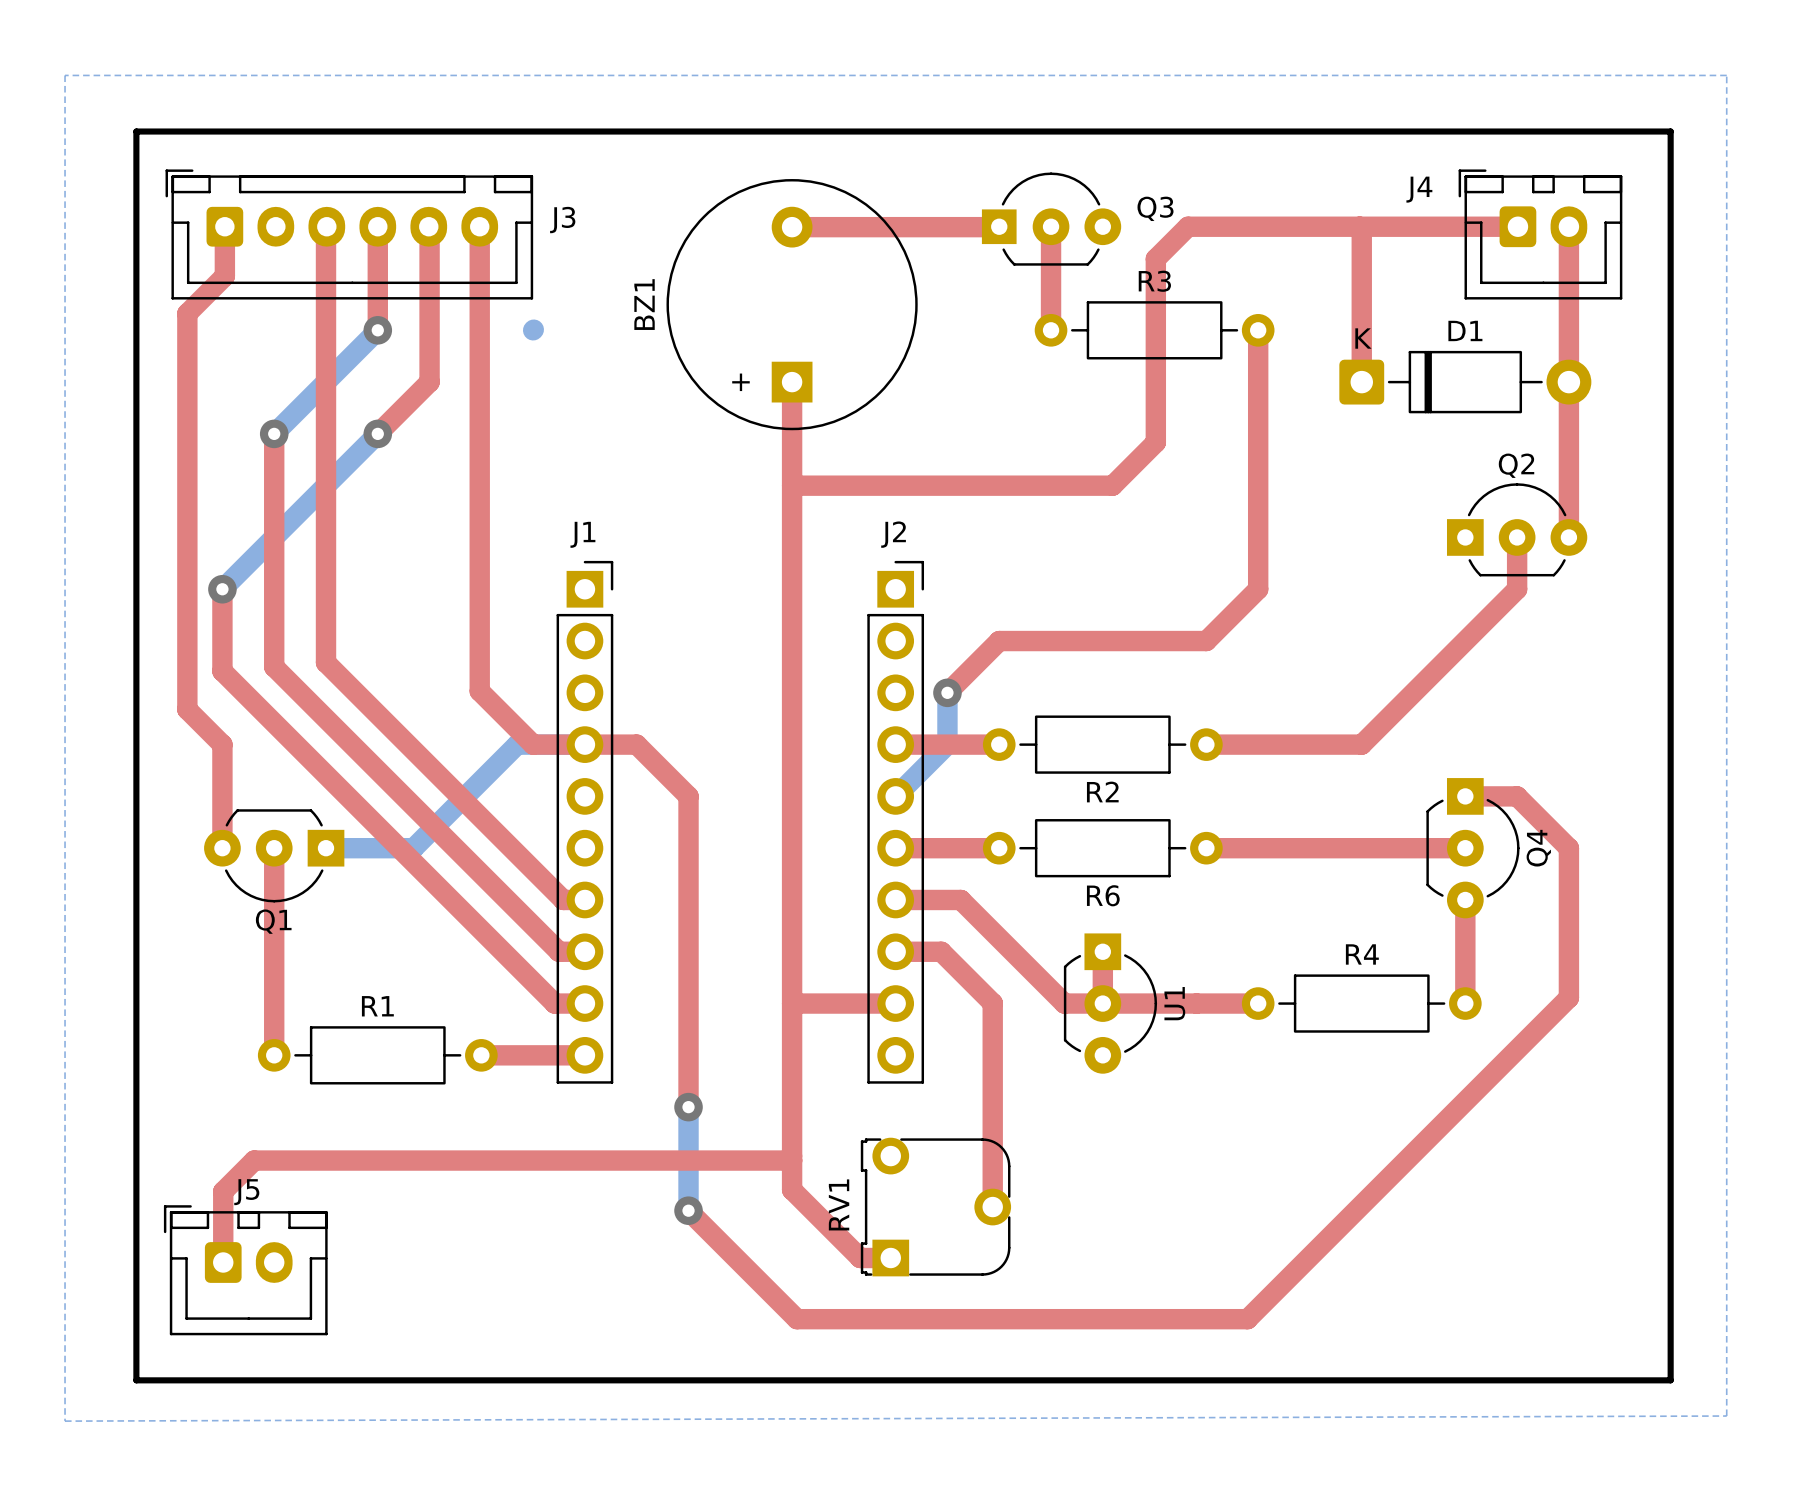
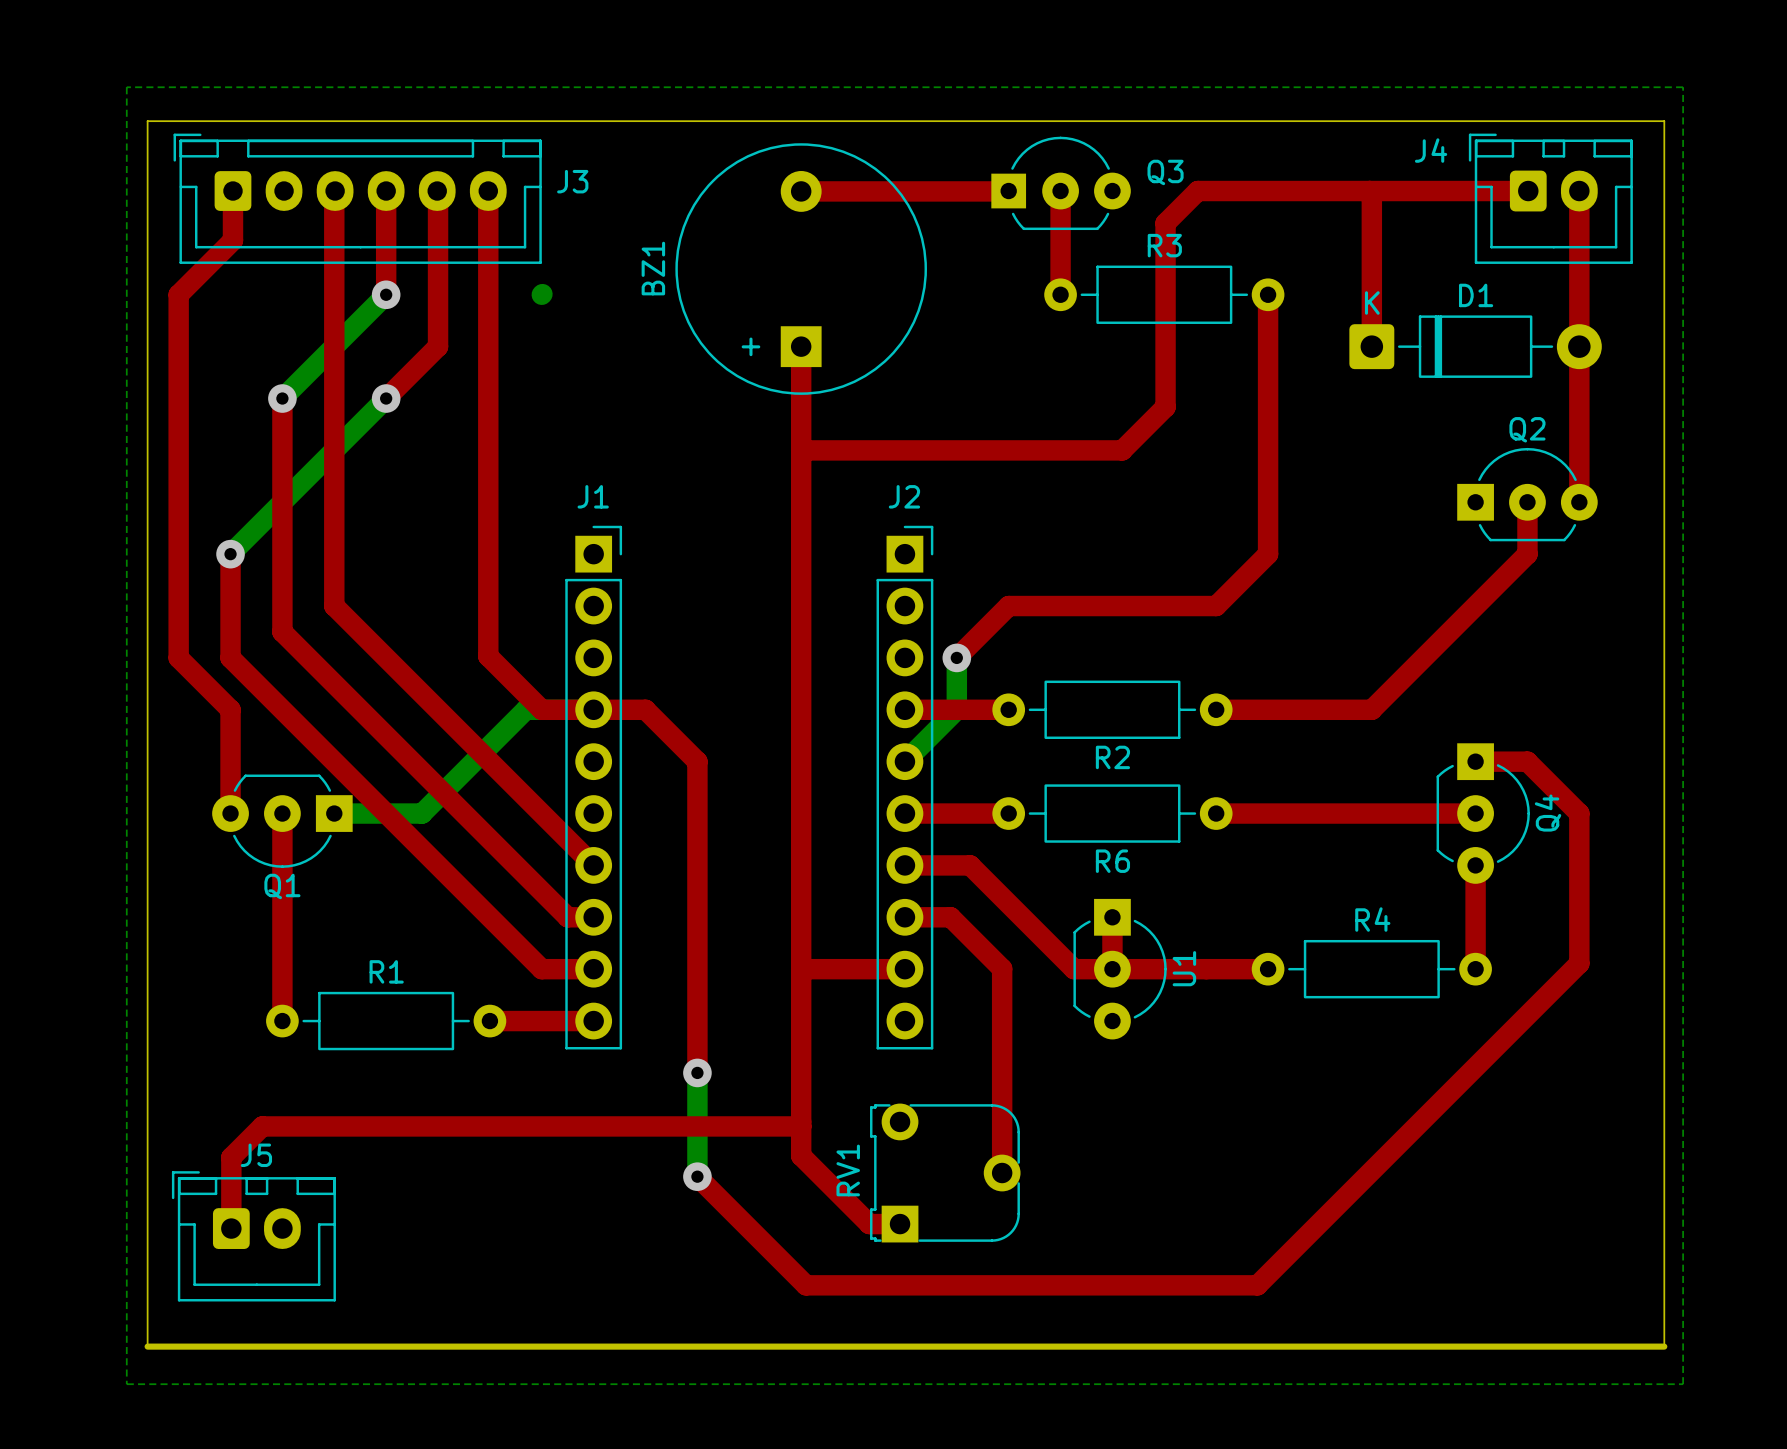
bottom zone outline: (65, 75) (65, 1421) (1726, 1416) (1726, 75) (65, 75) -> (126, 87) (126, 1384) (1683, 1384) (1683, 87) (126, 87)
top track: (187, 313) (187, 709) -> (195, 278) (178, 294) (178, 657) (195, 674)
top track: (326, 641) (326, 662) (563, 899) (584, 899) -> (334, 606) (593, 865)
top track: (222, 671) (554, 1003) -> (230, 636) (230, 657) (541, 969) (563, 969)
board edge: (139, 1380) (136, 1380) (136, 131) (1670, 131) (1670, 1380) (1653, 1380) -> (147, 1346) (147, 121) (1664, 121) (1664, 1346)

